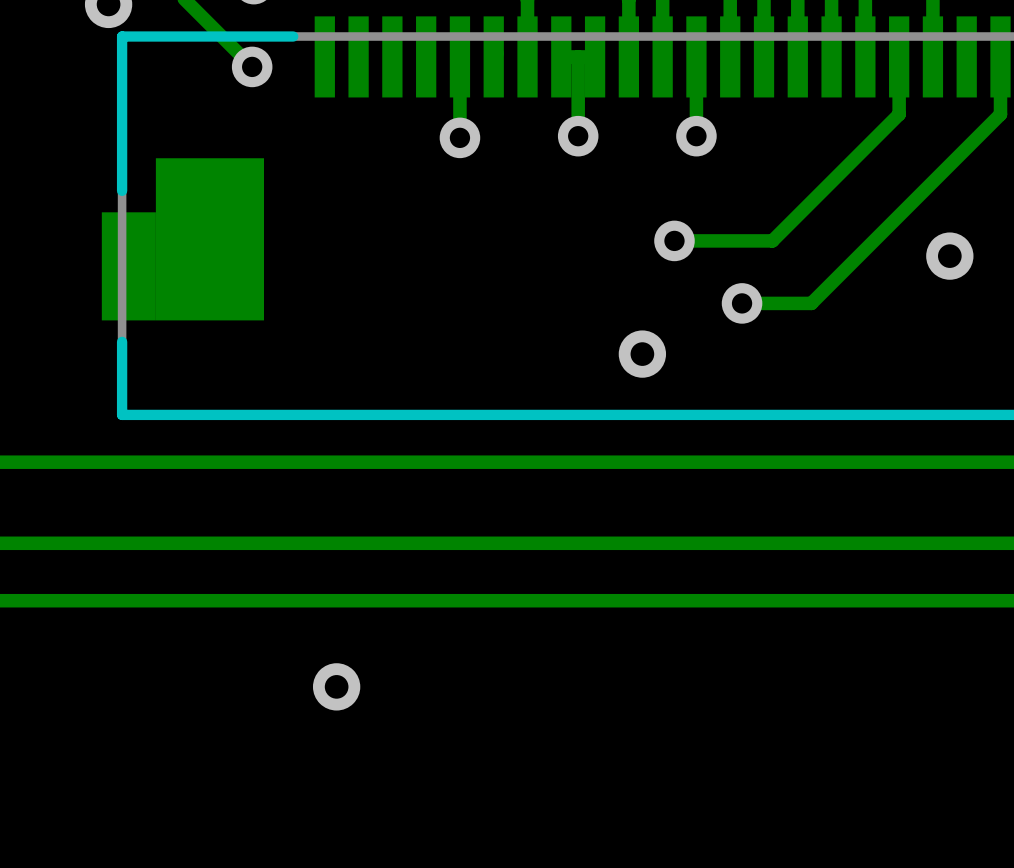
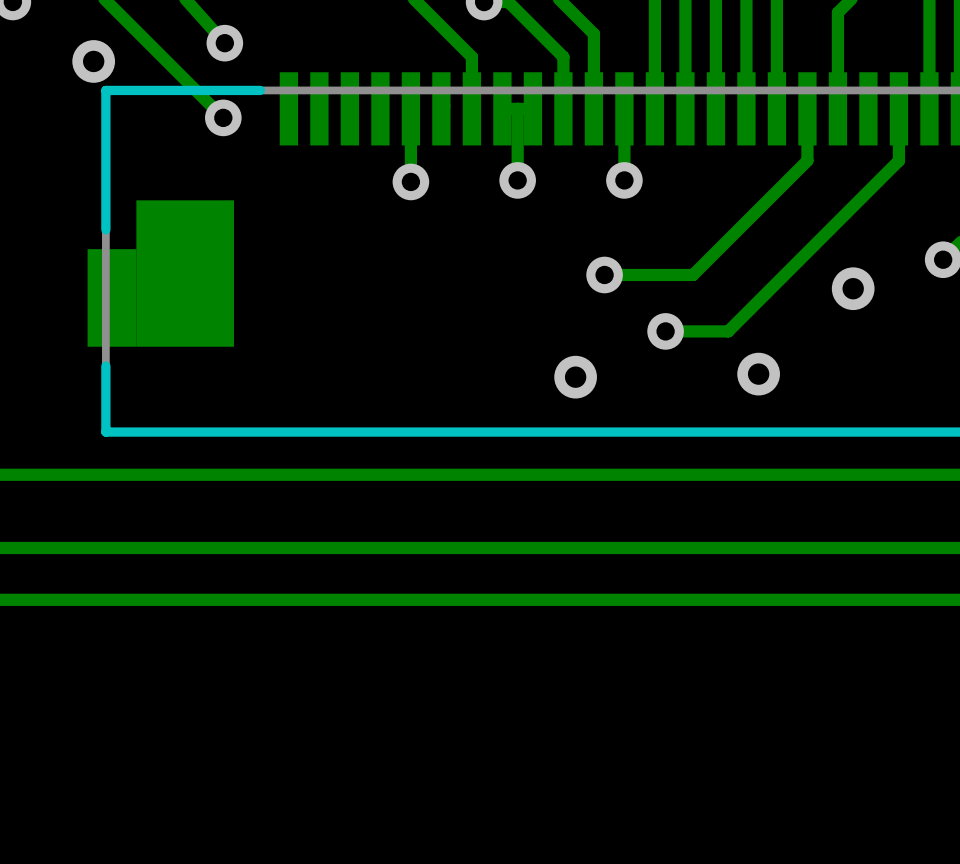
via: none -> (758, 374)
via: (336, 686) -> none

